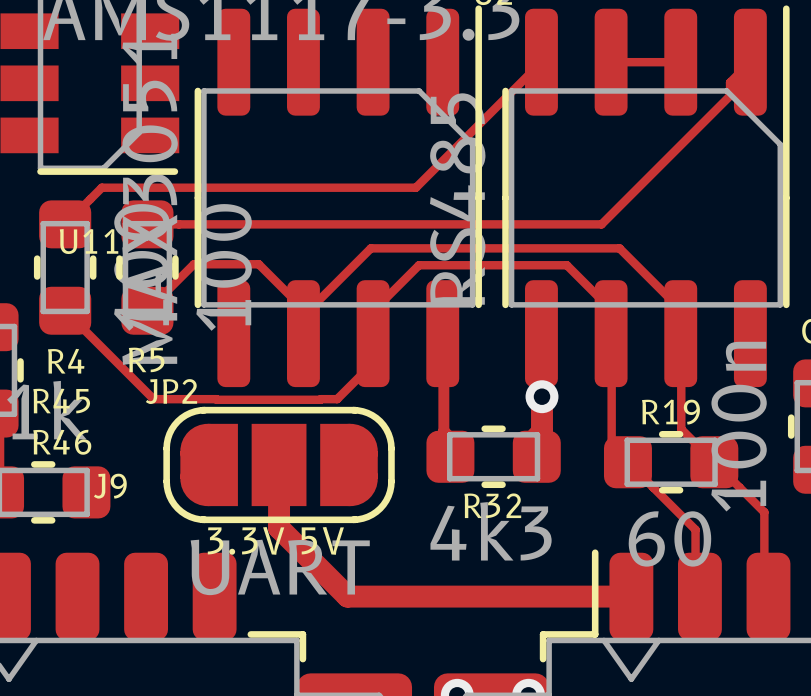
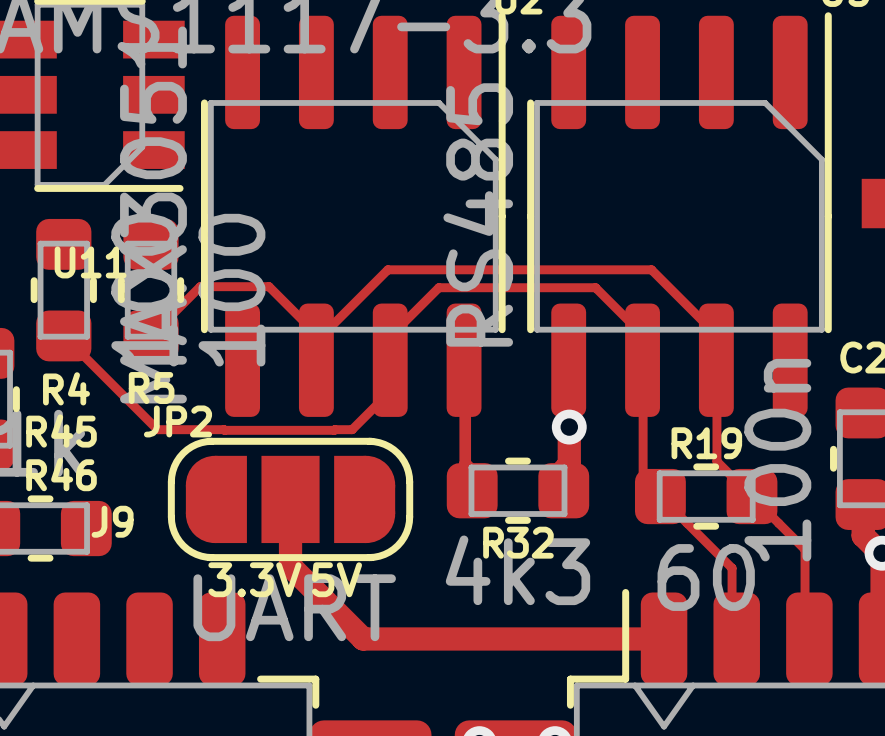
track: (541, 62) (415, 187) (101, 187) (65, 224) -> none
track: (611, 62) (680, 62) -> none
track: (750, 62) (730, 82) (730, 95) (601, 224) (147, 224) -> none

